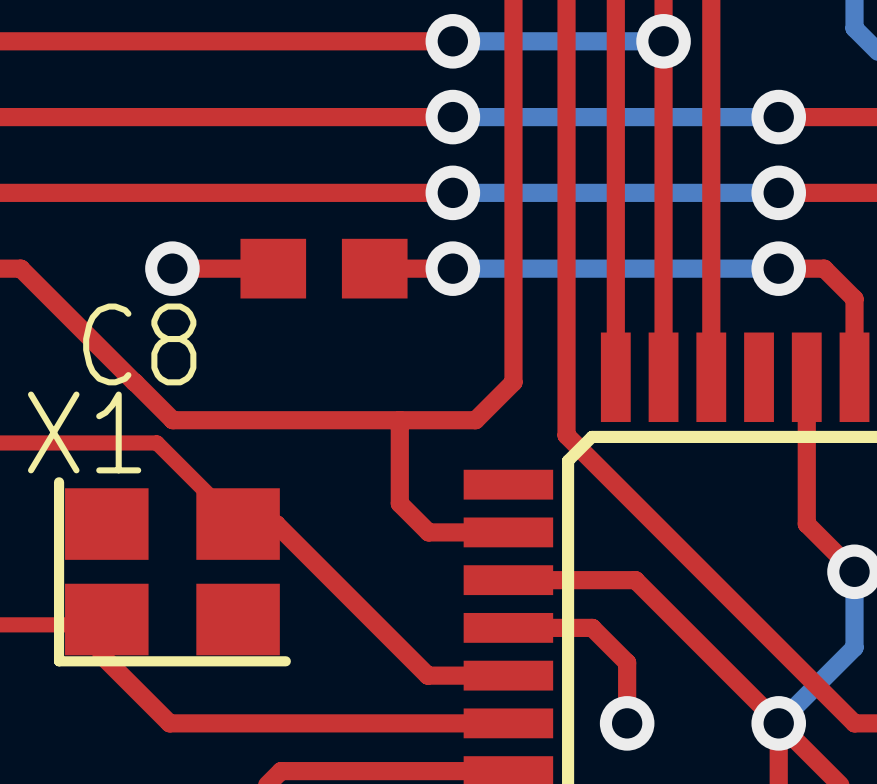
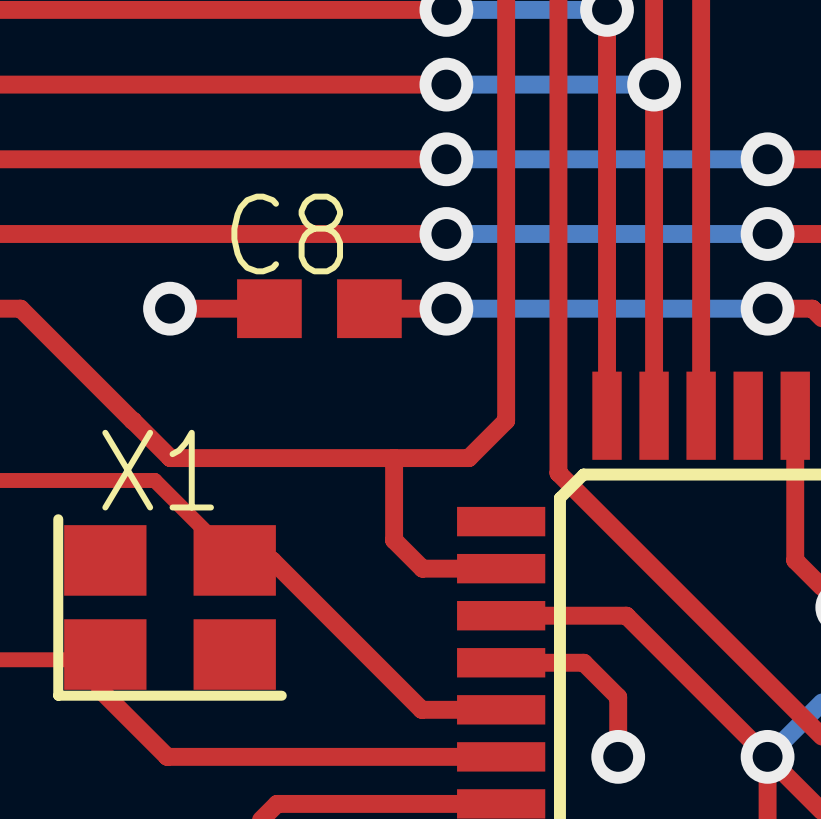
C8 name position: C8 (139, 344) -> C8 (287, 233)
X1 name position: X1 (84, 432) -> X1 (158, 470)

